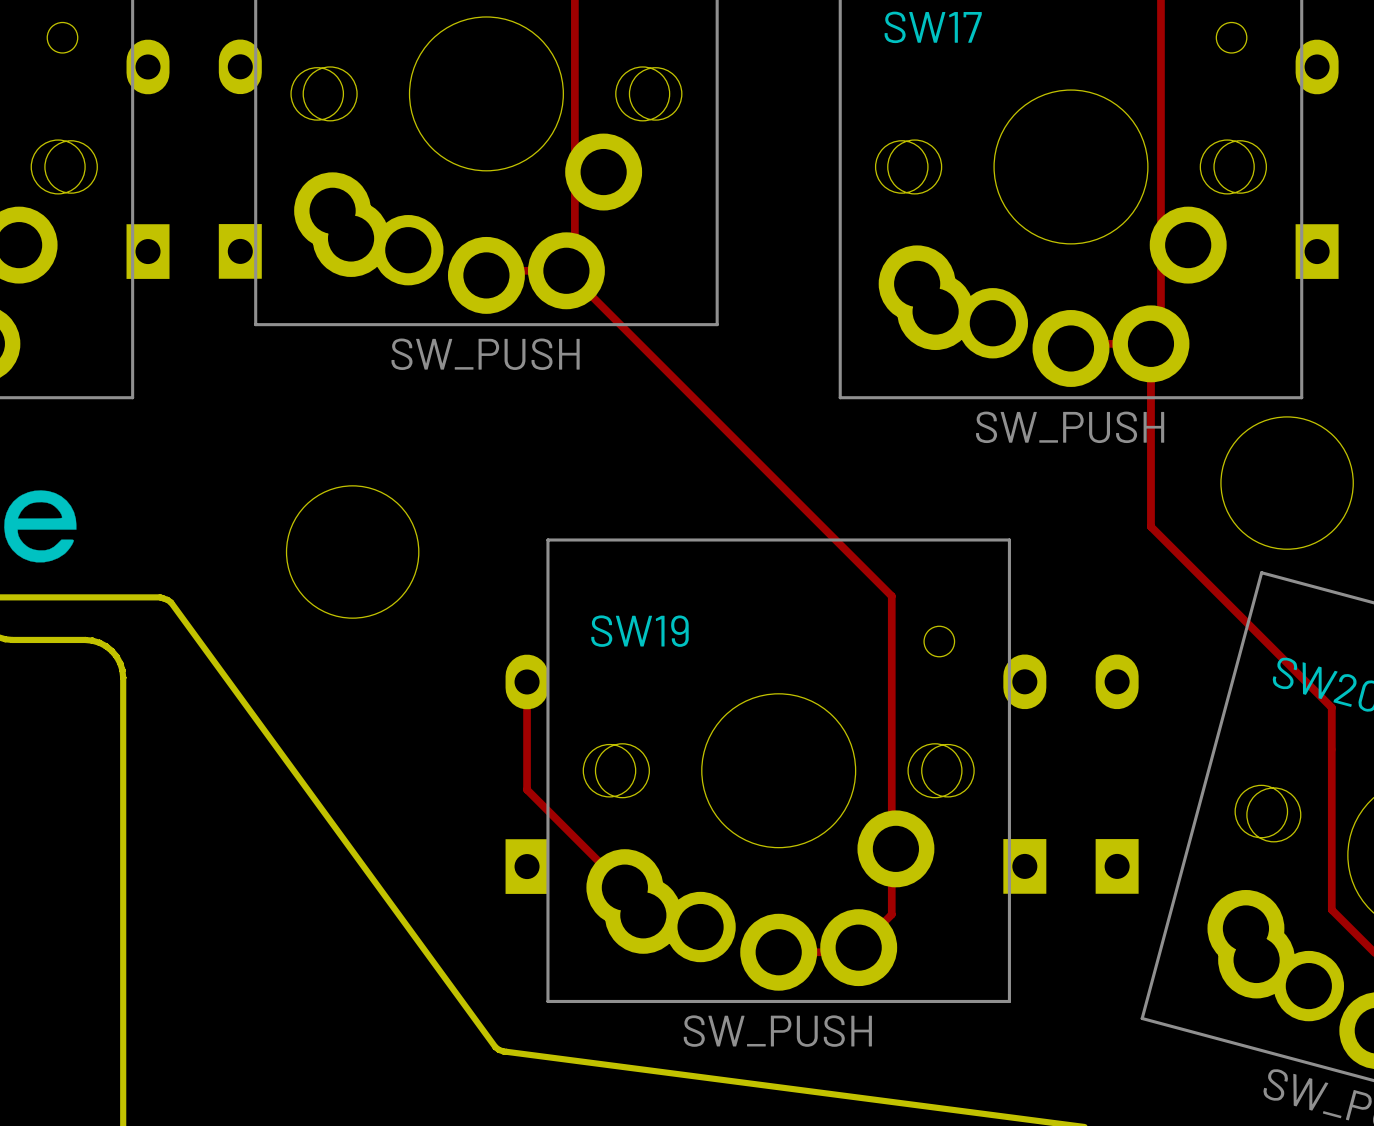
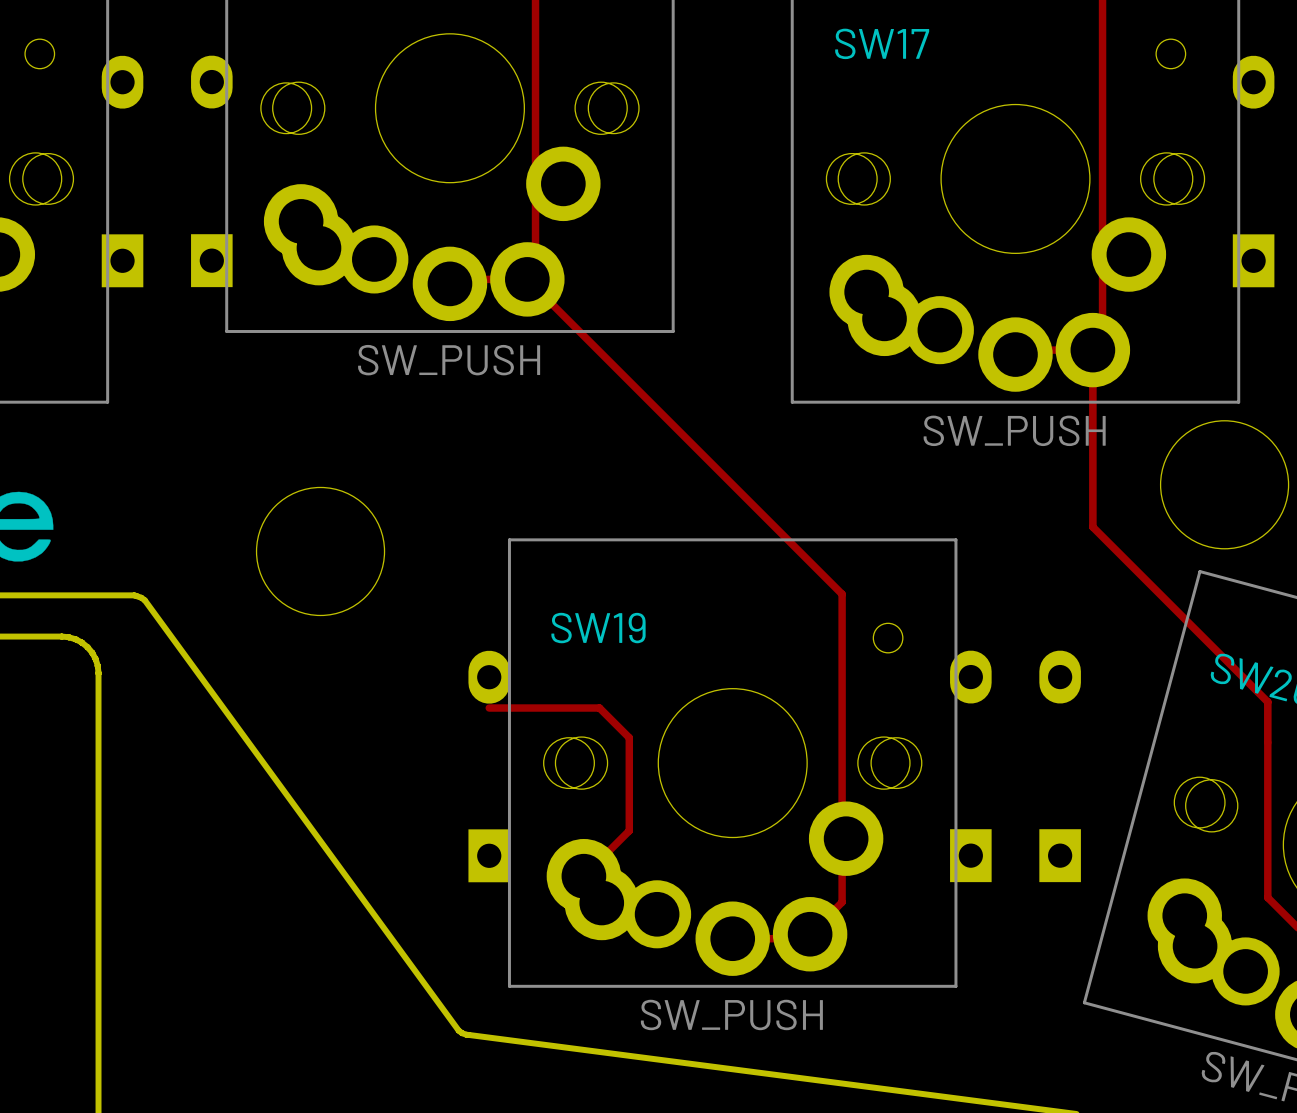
track: (527, 681) (527, 789) (624, 887) -> (489, 708) (599, 708) (629, 737) (629, 830) (583, 876)

